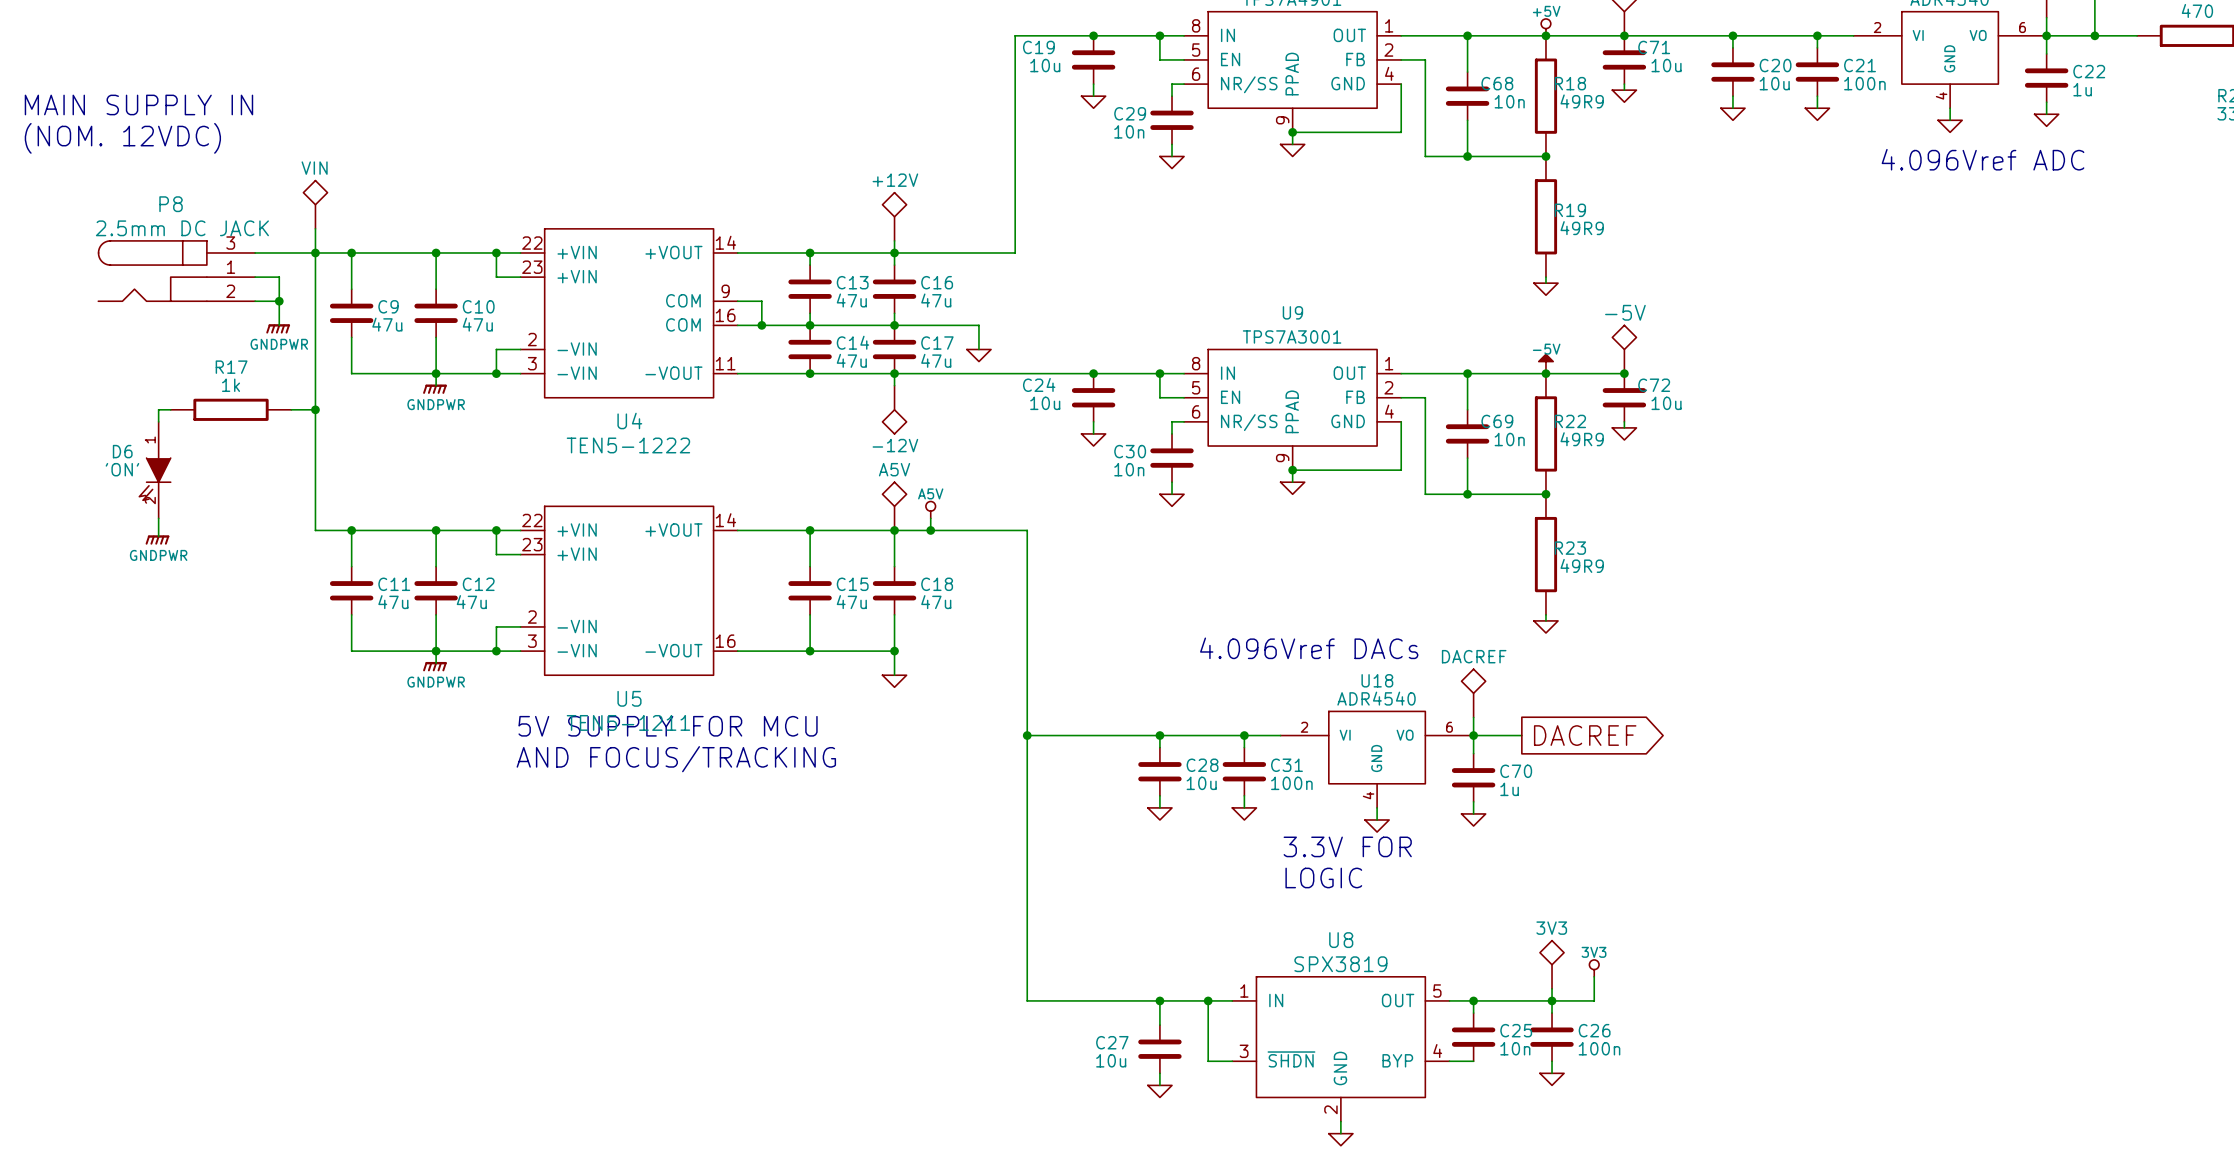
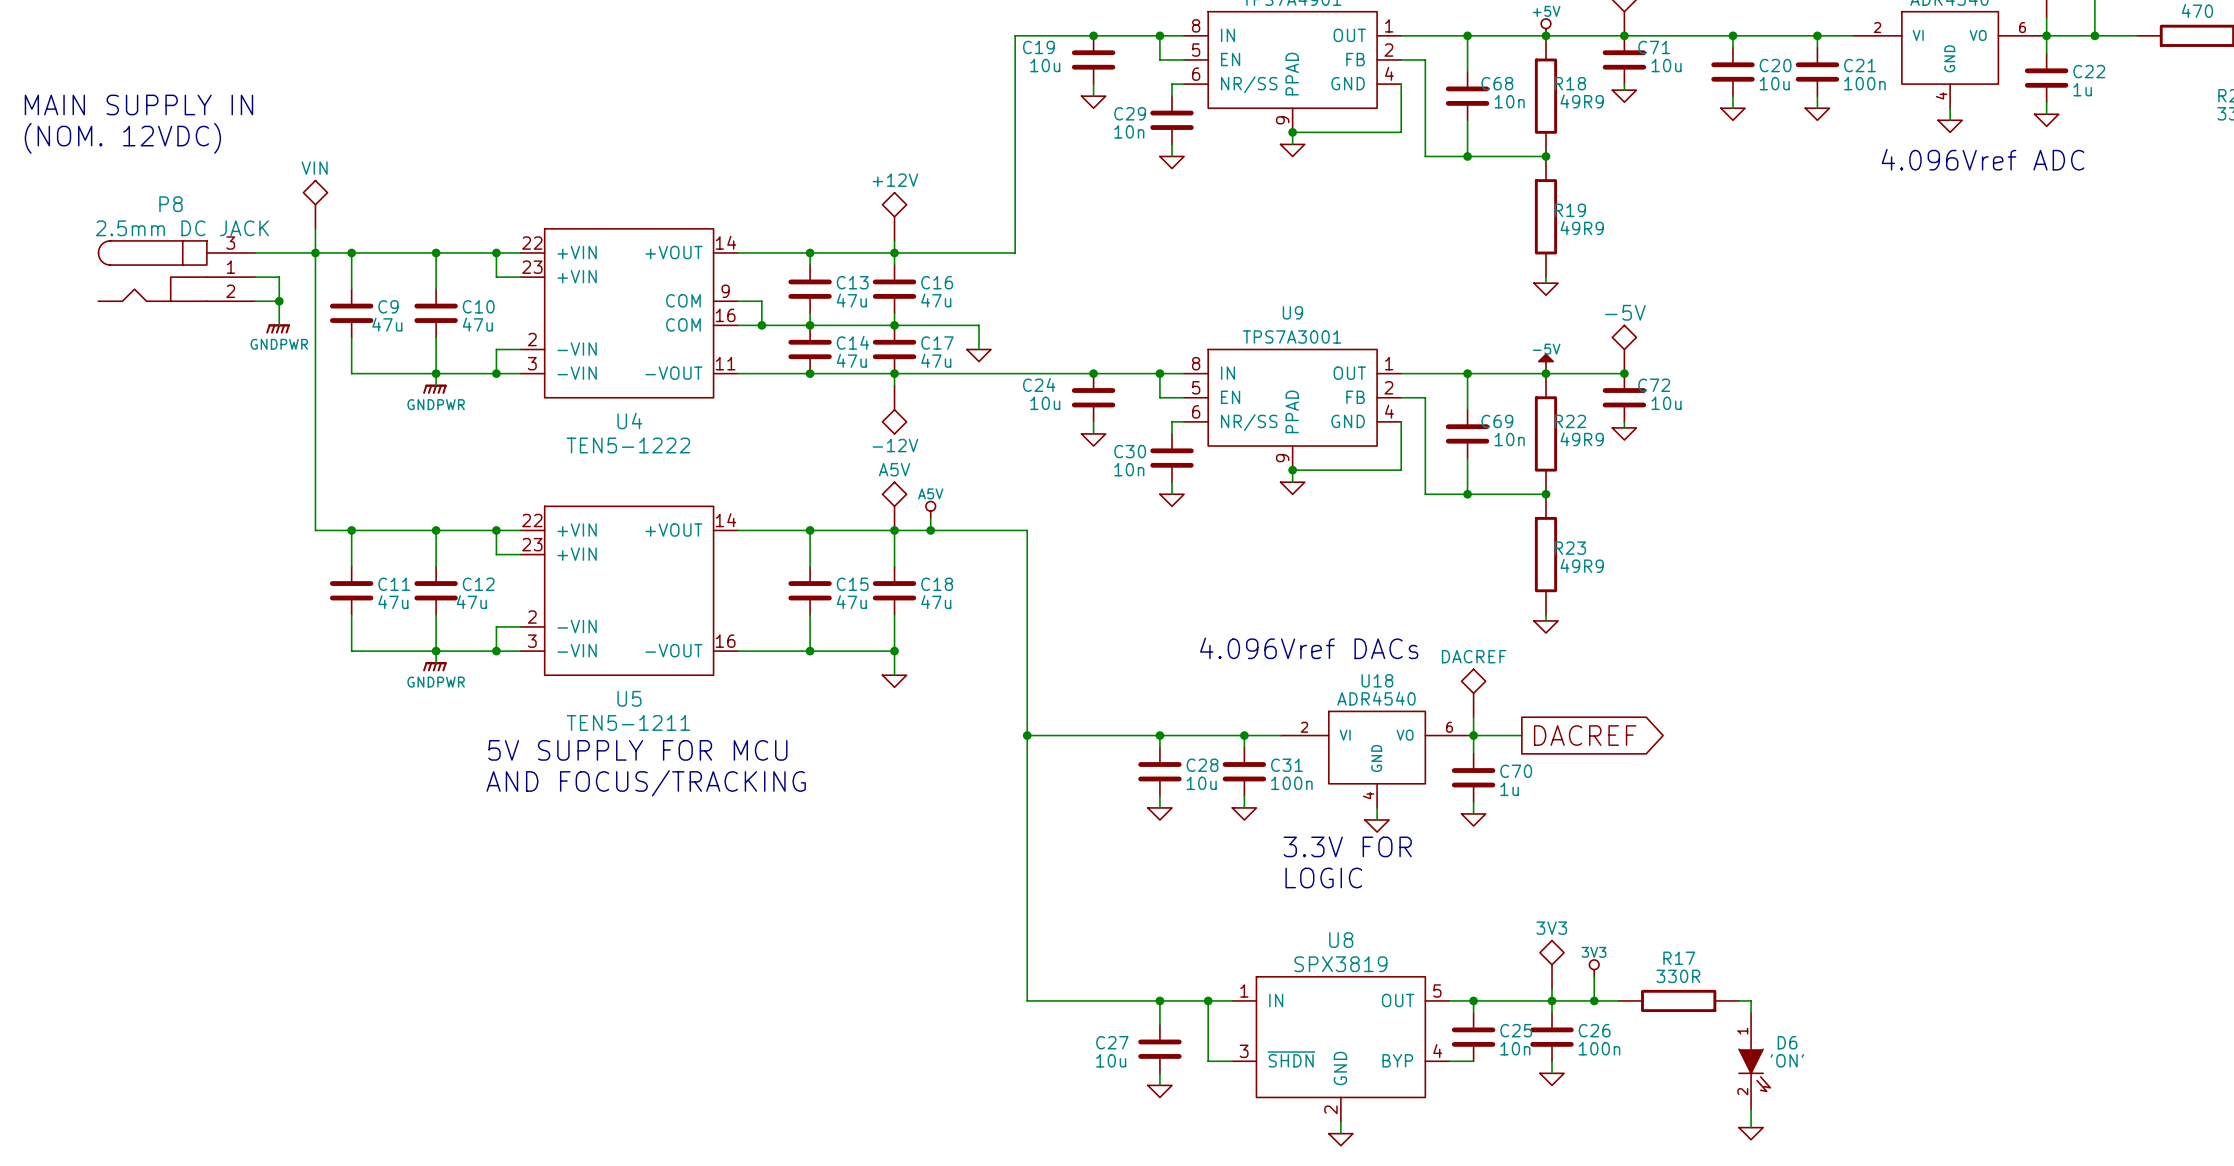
R17 value: 1k (231, 385) -> 330R (1678, 976)
wire: (170, 409) (158, 409) (158, 421) -> none
R17 position: (231, 409) -> (1678, 1000)
wire: (291, 409) (315, 409) -> none
junction: (315, 409) -> none
D6 position: (155, 470) -> (1754, 1061)
D6 flip: as is (155, 479) -> left-right (1754, 1070)
wire: (158, 518) (158, 536) -> none
power symbol: GNDPWR (157, 539) -> none
text position: 5V SUPPLY FOR MCU (668, 726) -> 5V SUPPLY FOR MCU (637, 750)
text position: AND FOCUS/TRACKING (676, 759) -> AND FOCUS/TRACKING (646, 783)
wire: none -> (1594, 1000) (1618, 1000)
junction: none -> (1594, 1000)
wire: none -> (1739, 1000) (1751, 1000) (1751, 1013)
wire: none -> (1751, 1109) (1751, 1127)
power symbol: none -> (1751, 1133)

